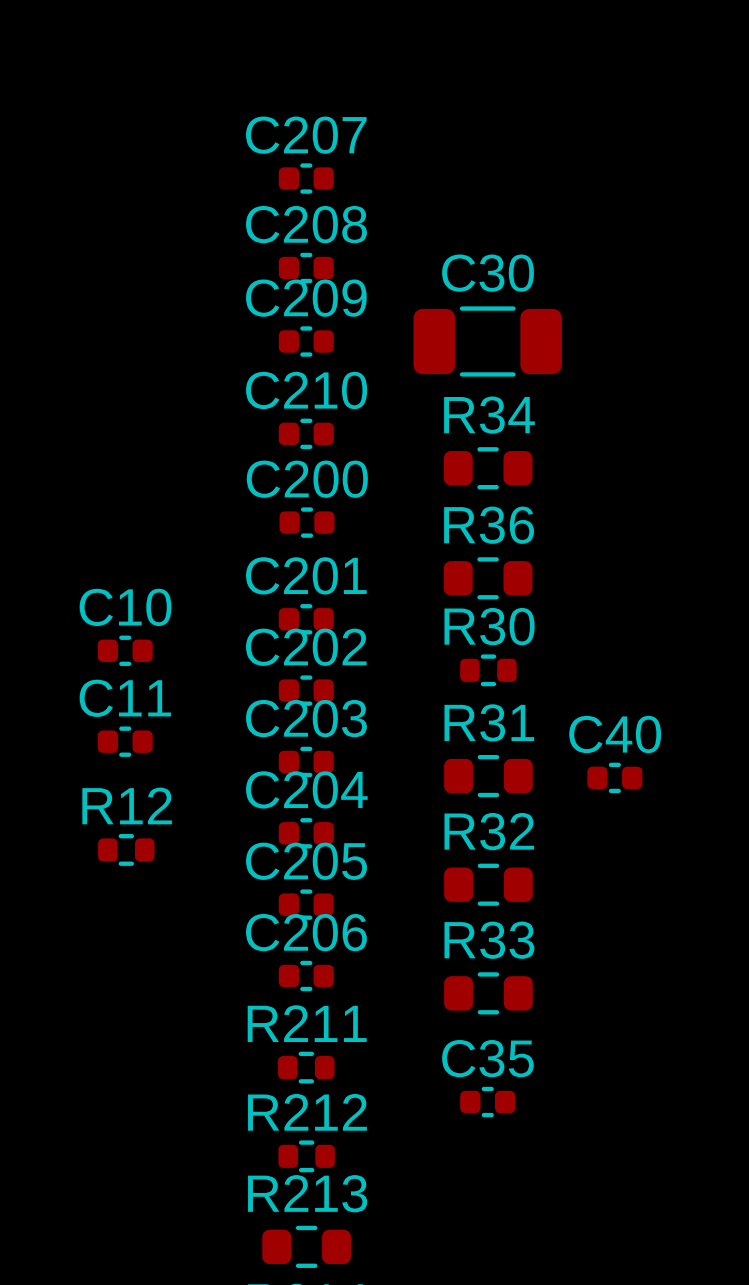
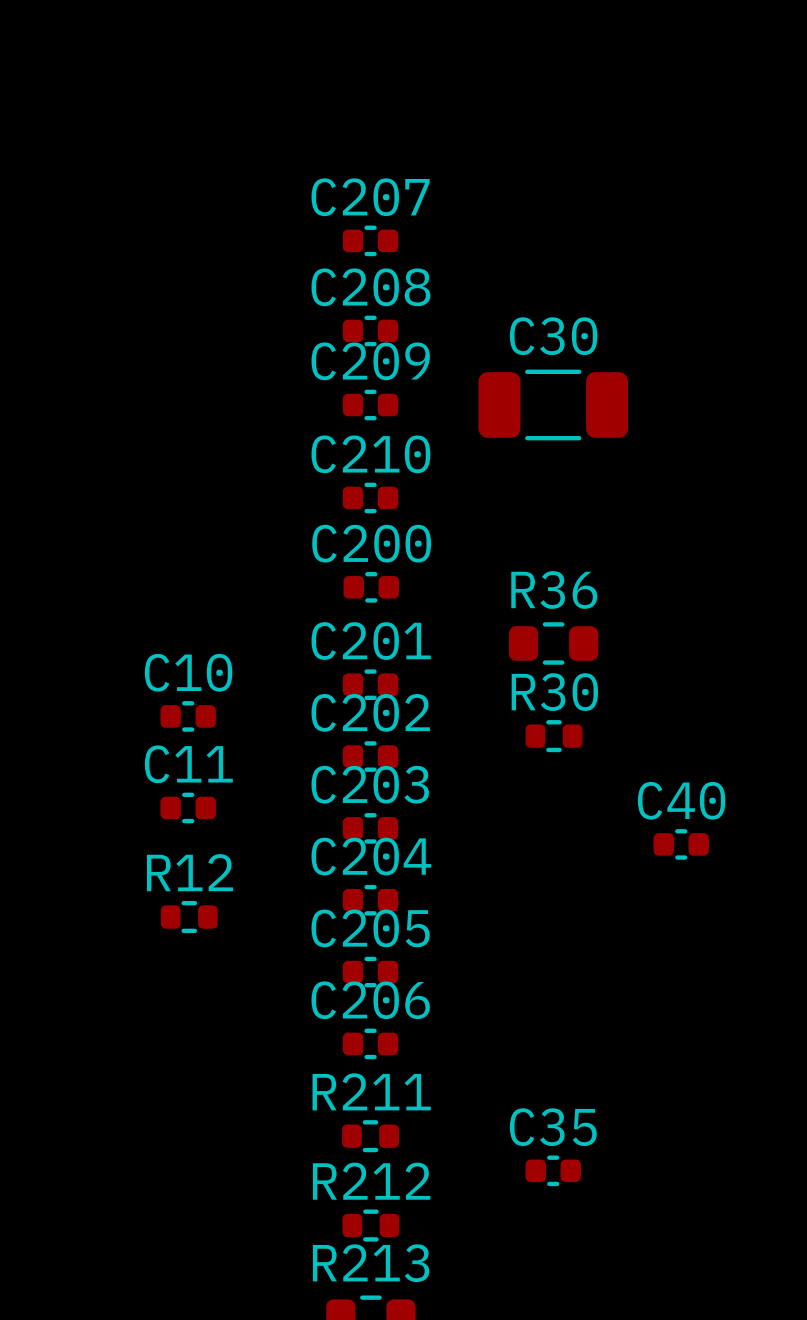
R34: (488, 468) -> none
R31: (488, 776) -> none
R32: (488, 884) -> none
R33: (488, 993) -> none

